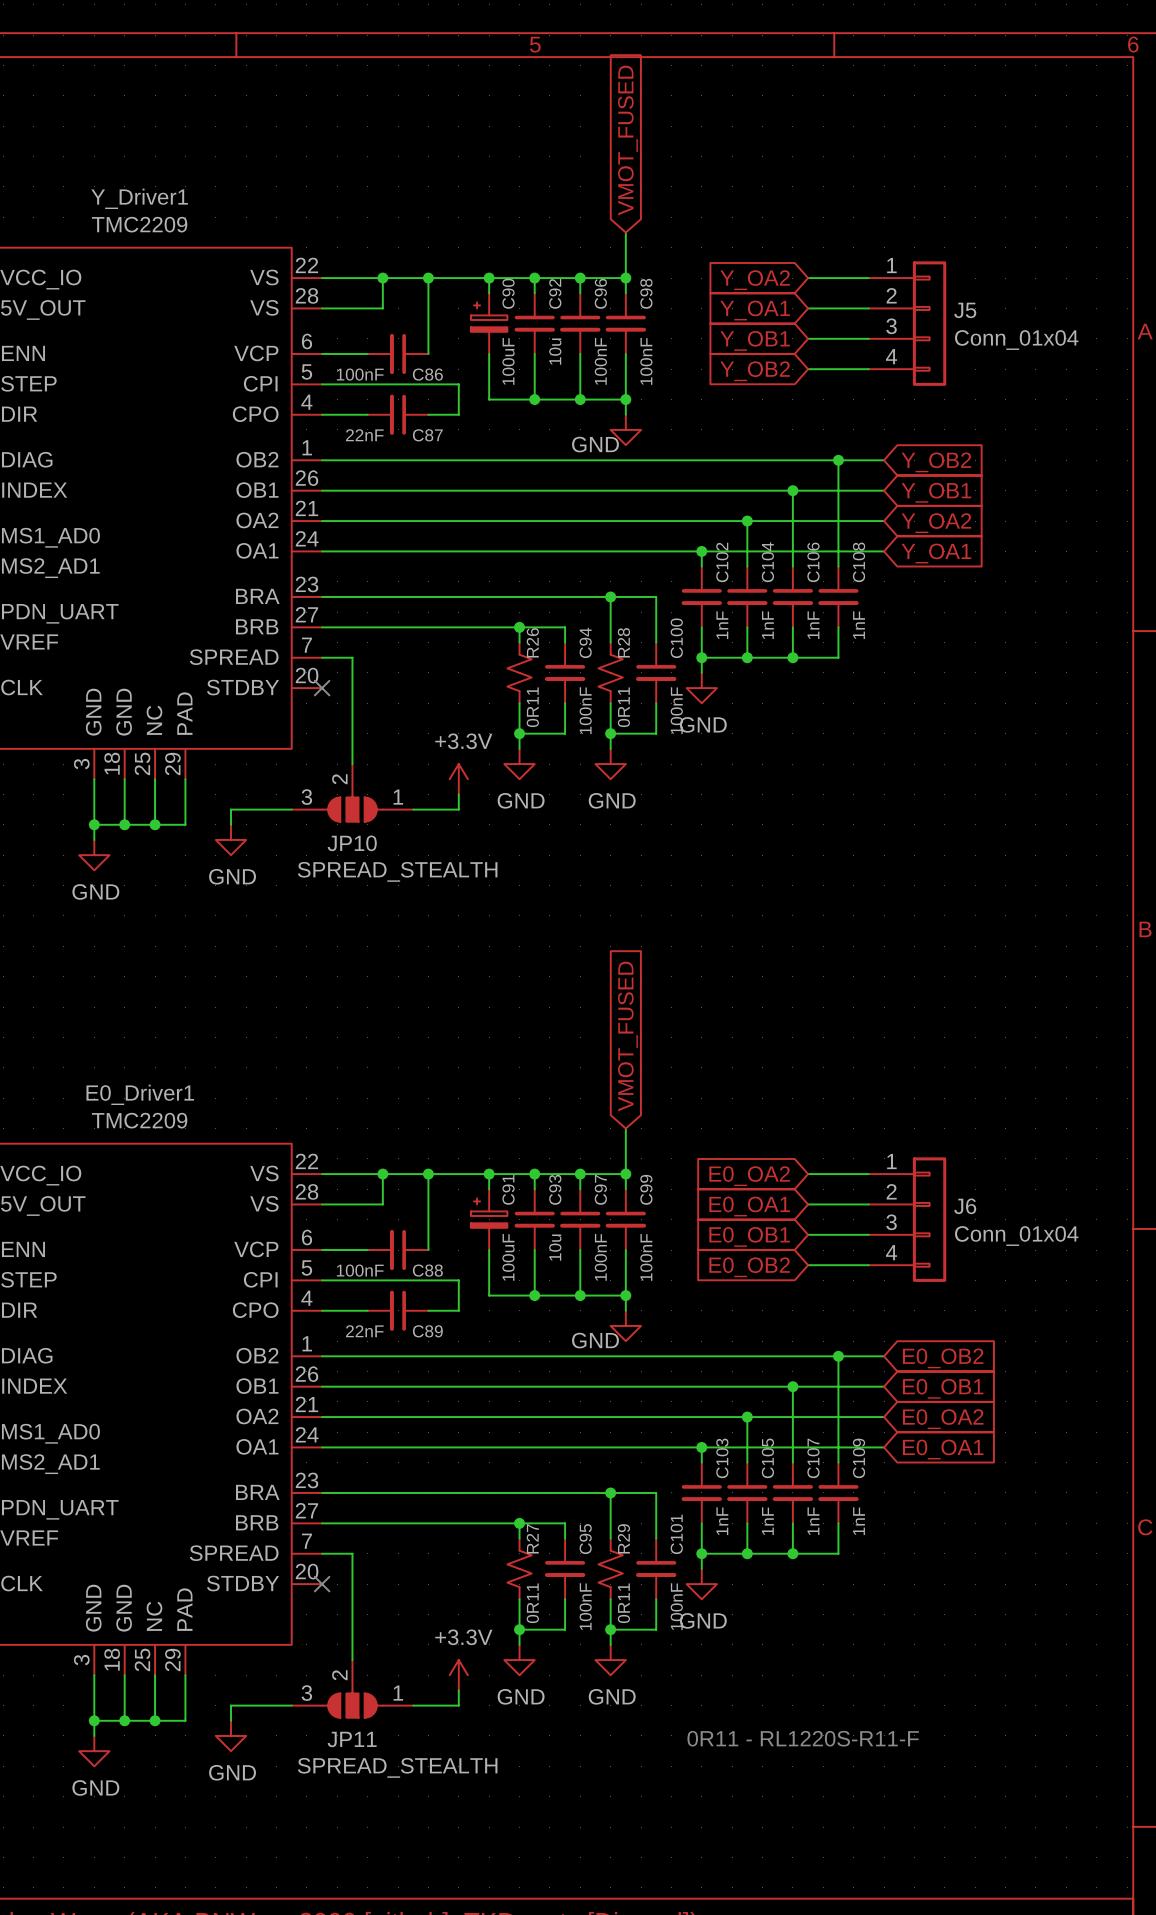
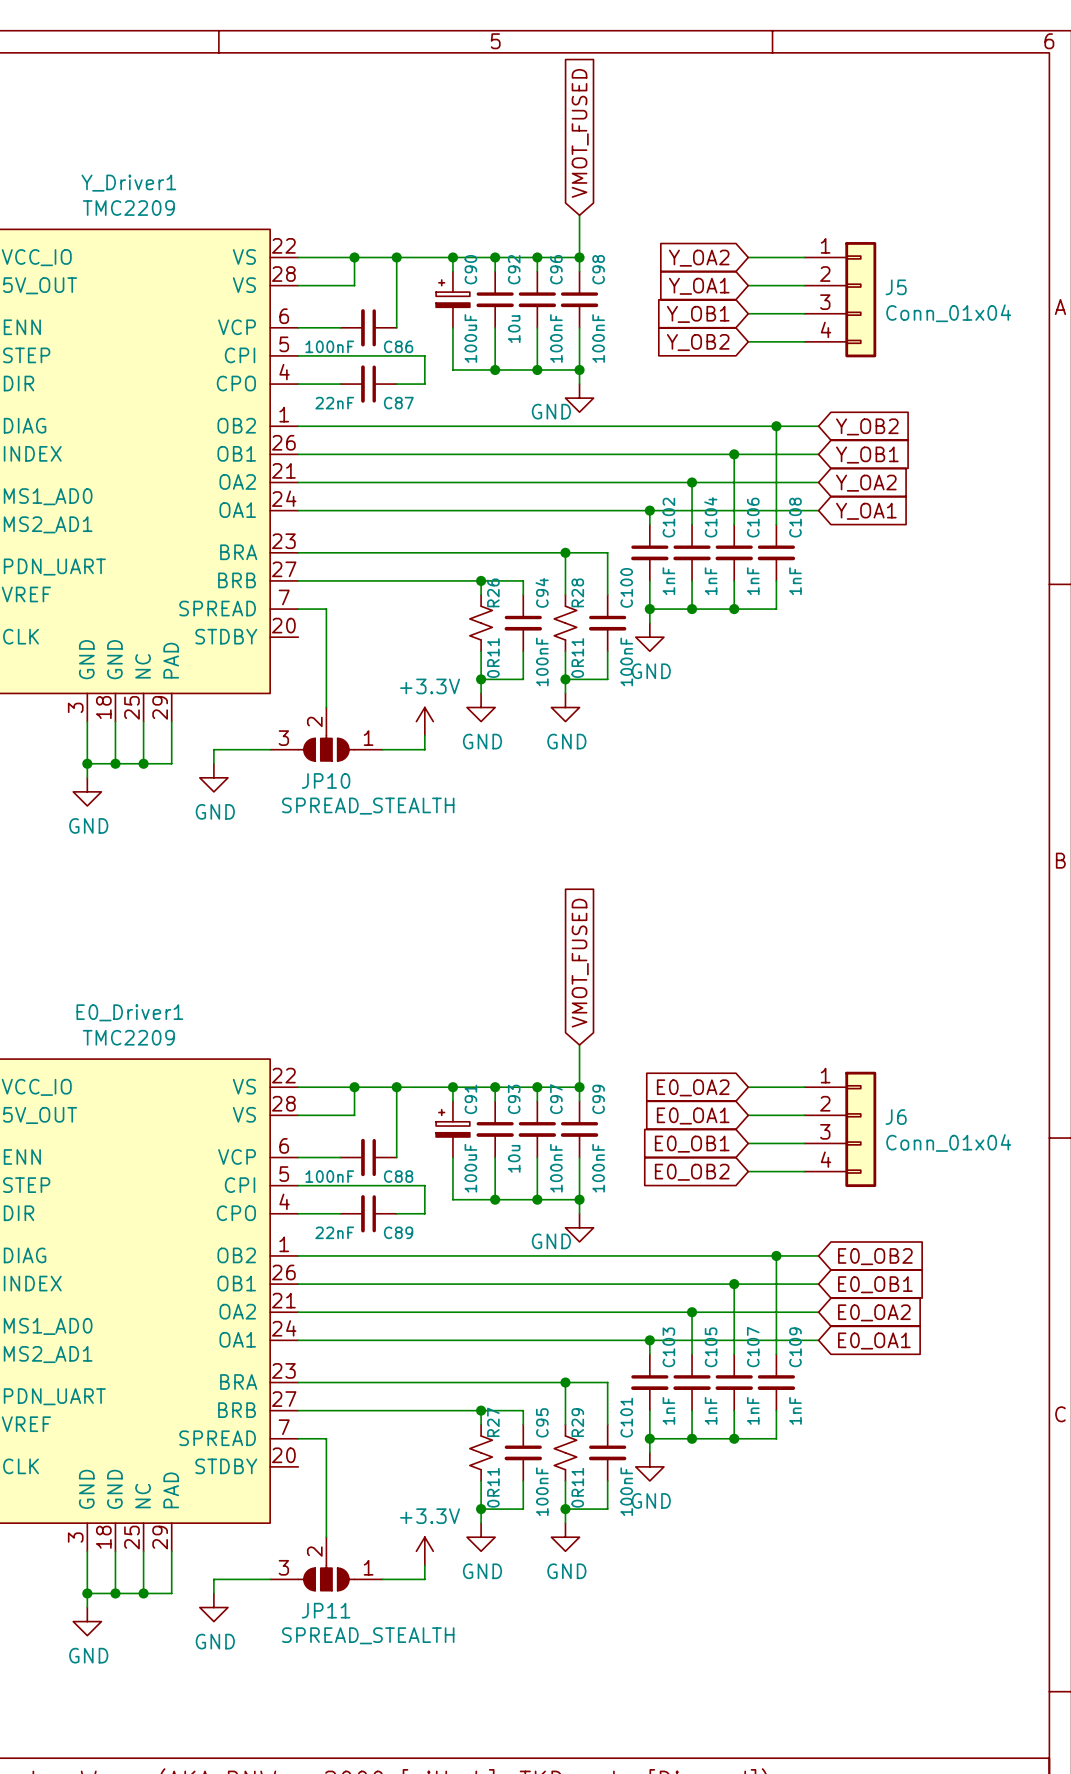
no-connect mark: (322, 688) -> none
no-connect mark: (322, 1584) -> none
text: 0R11 - RL1220S-R11-F (803, 1738) -> none

